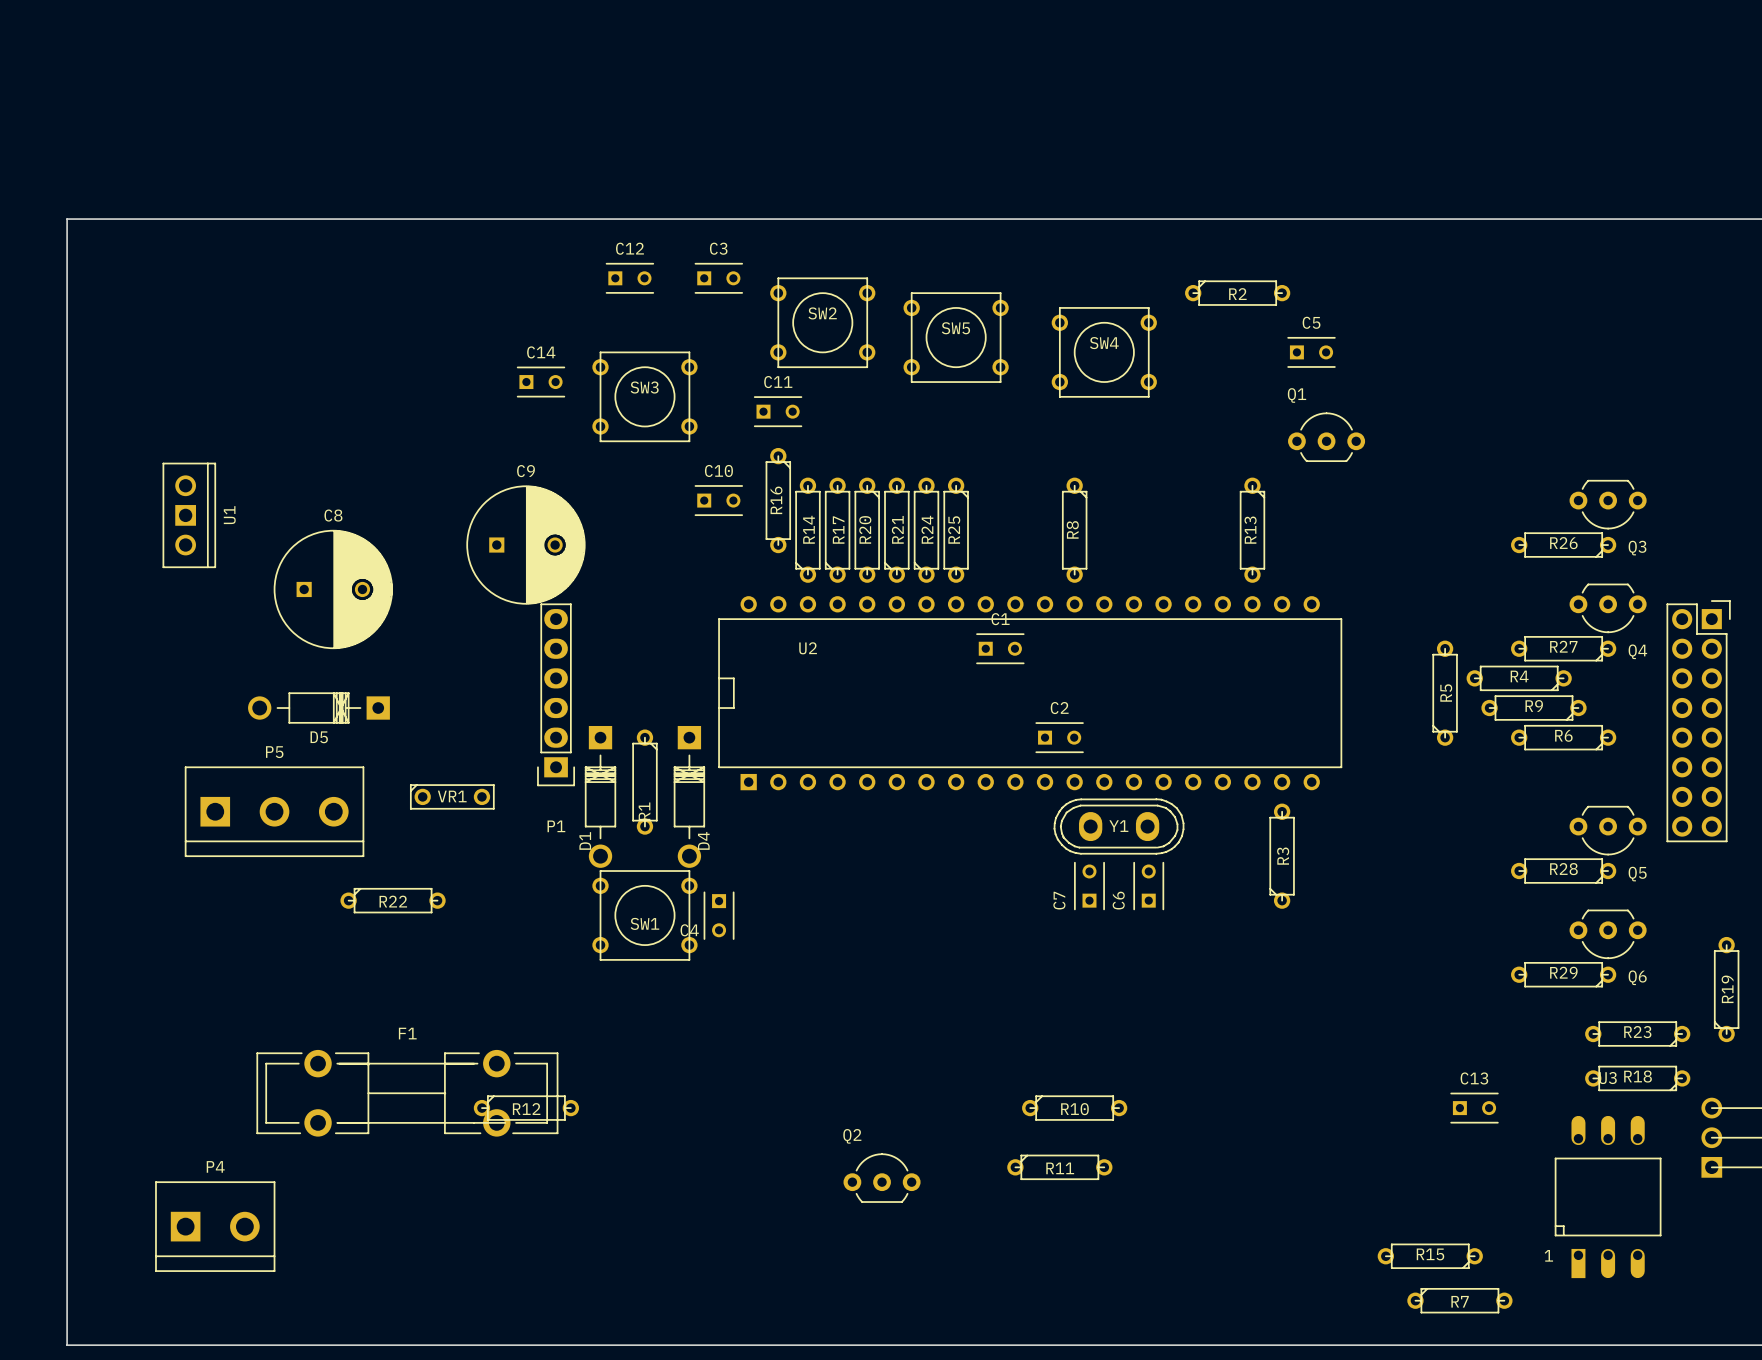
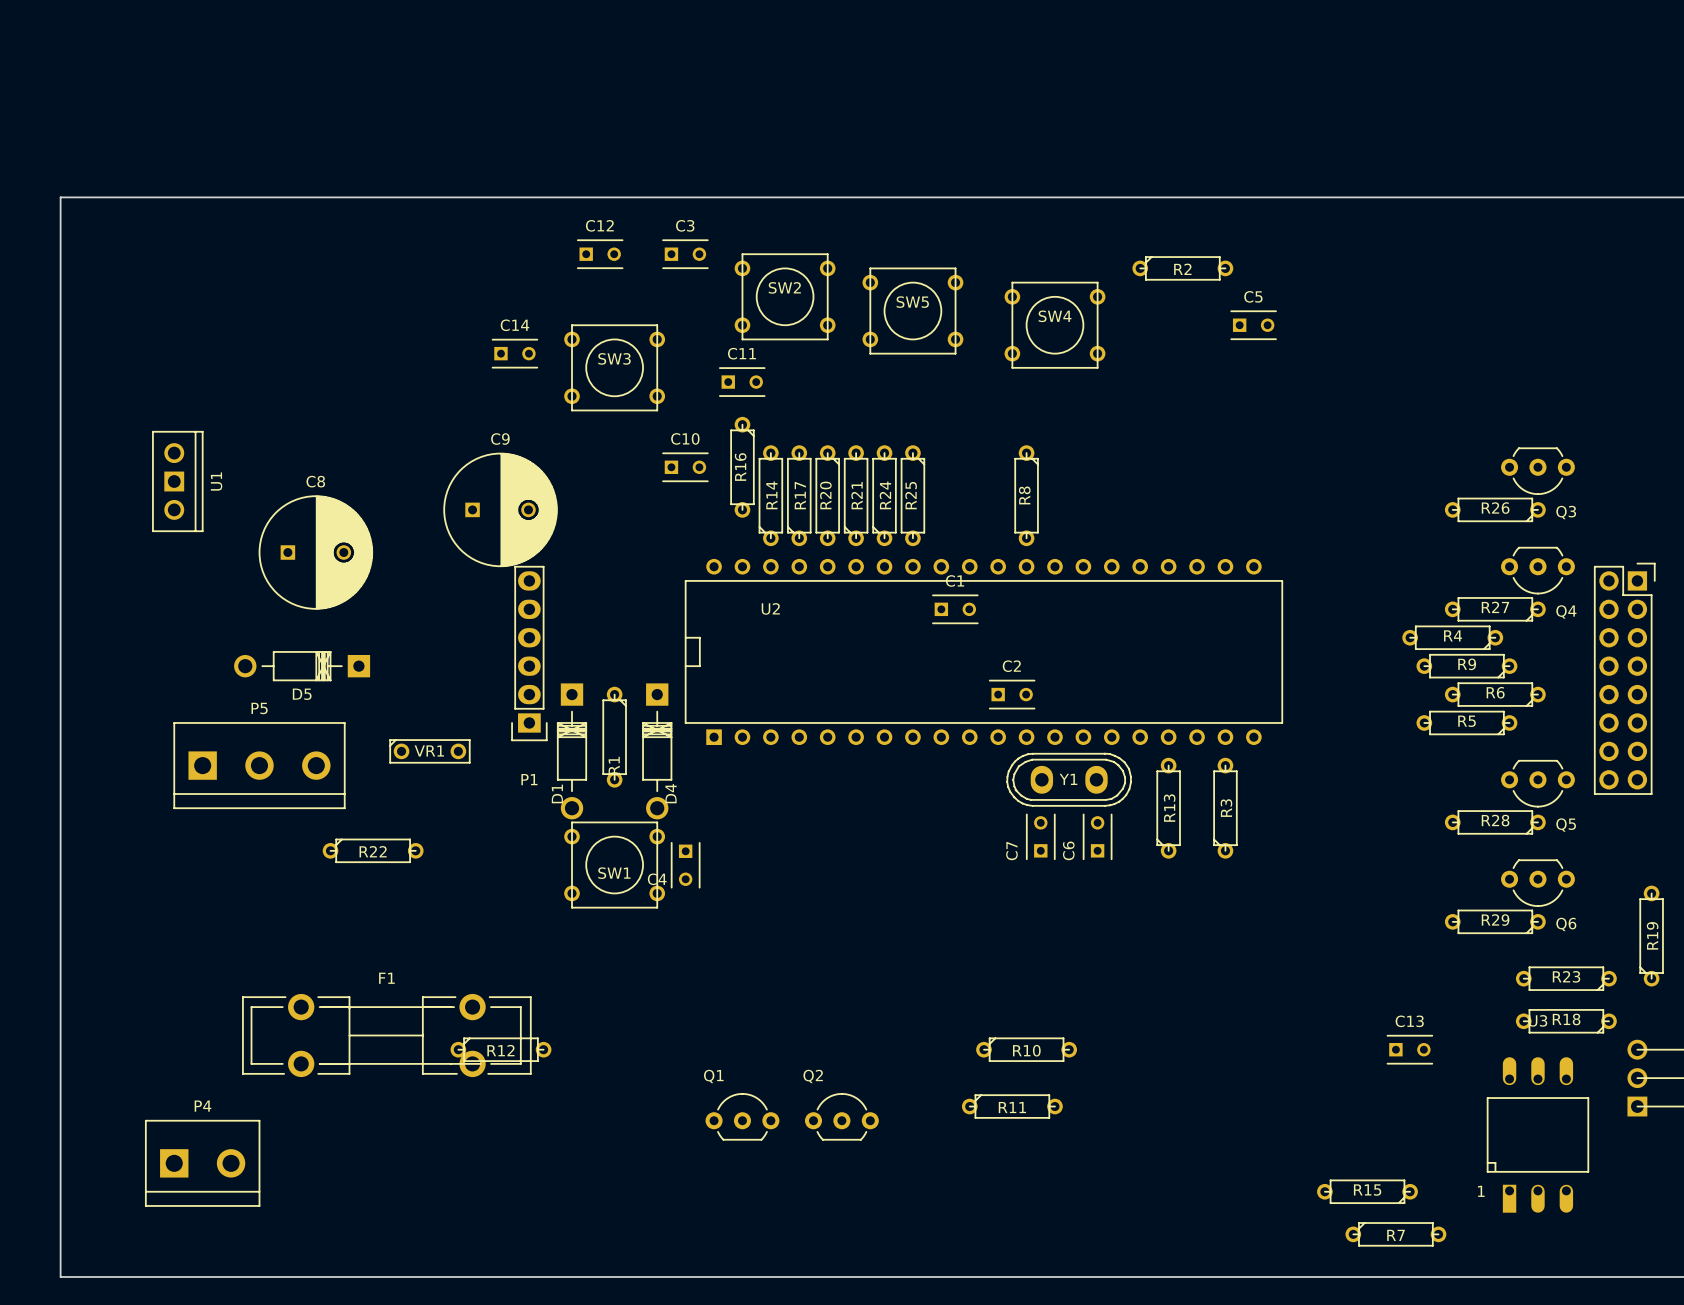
Q1 position: (1326, 437) -> (742, 1116)
R13 rotation: 0° (1252, 530) -> 180° (1168, 808)
R13 position: (1252, 530) -> (1168, 808)
R5 rotation: 0° (1445, 693) -> 90° counterclockwise (1466, 722)
R5 position: (1445, 693) -> (1466, 722)

